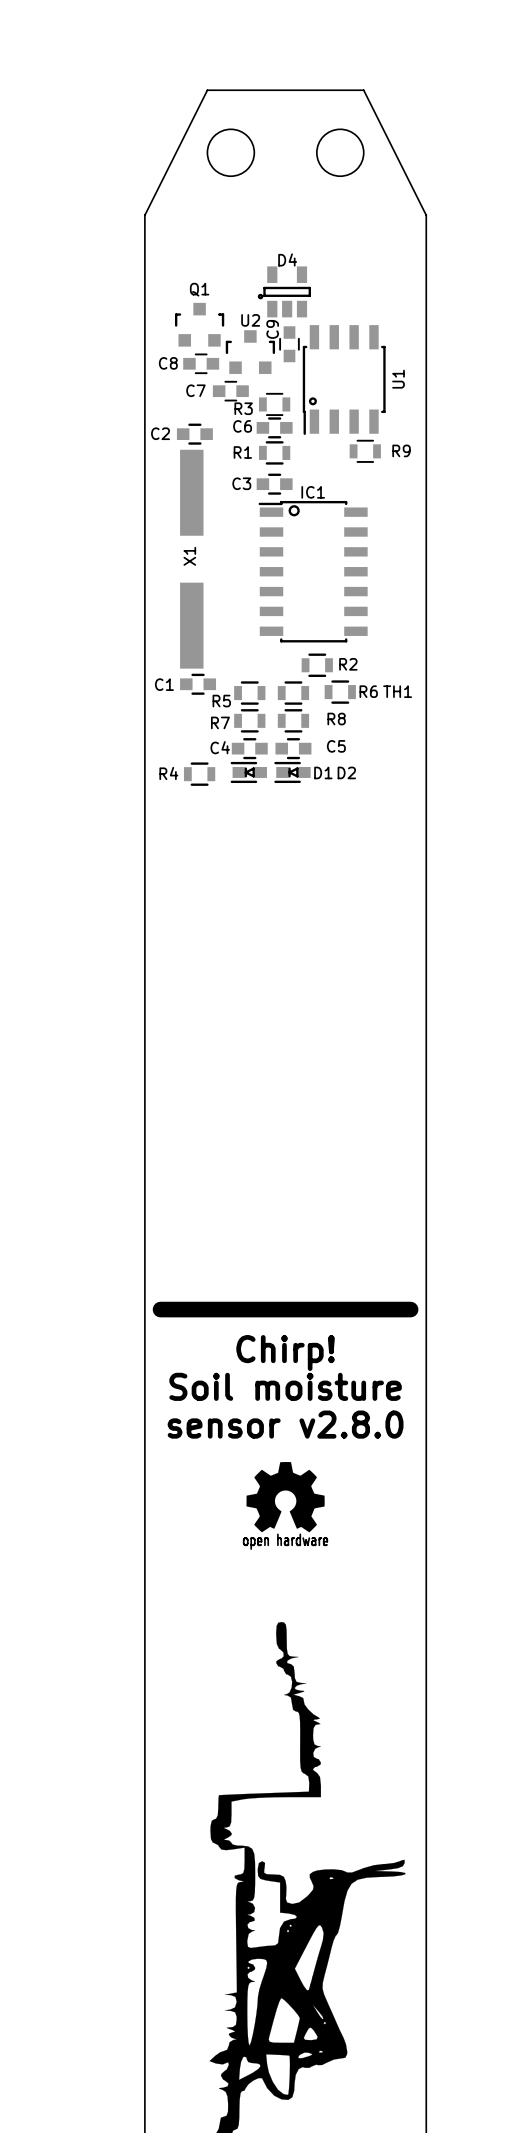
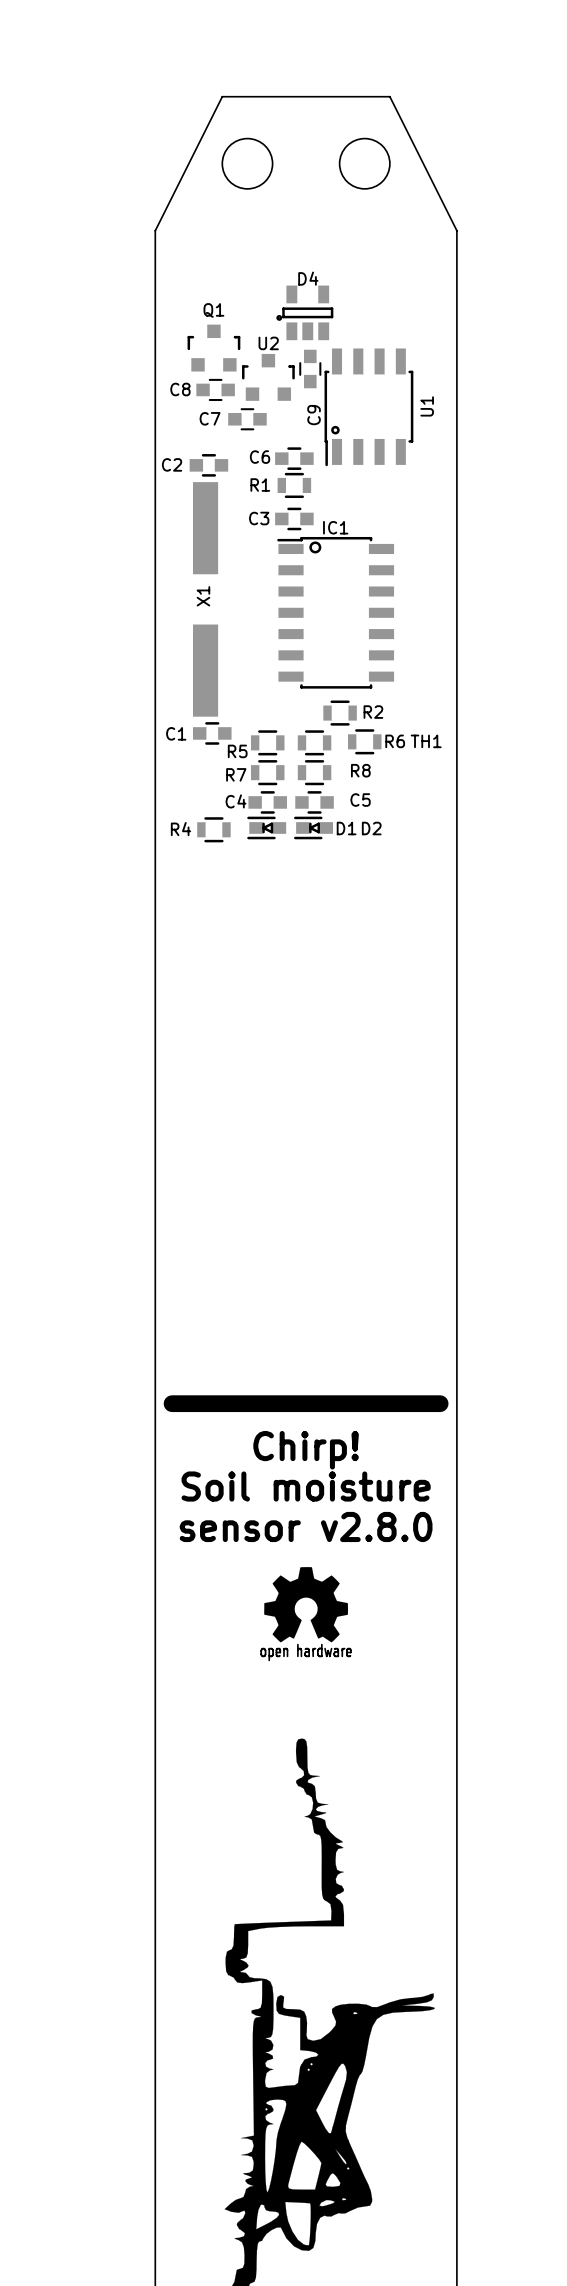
C9 name position: C9 (272, 329) -> C9 (314, 415)
R3: (274, 404) -> none
R9: (365, 451) -> none

